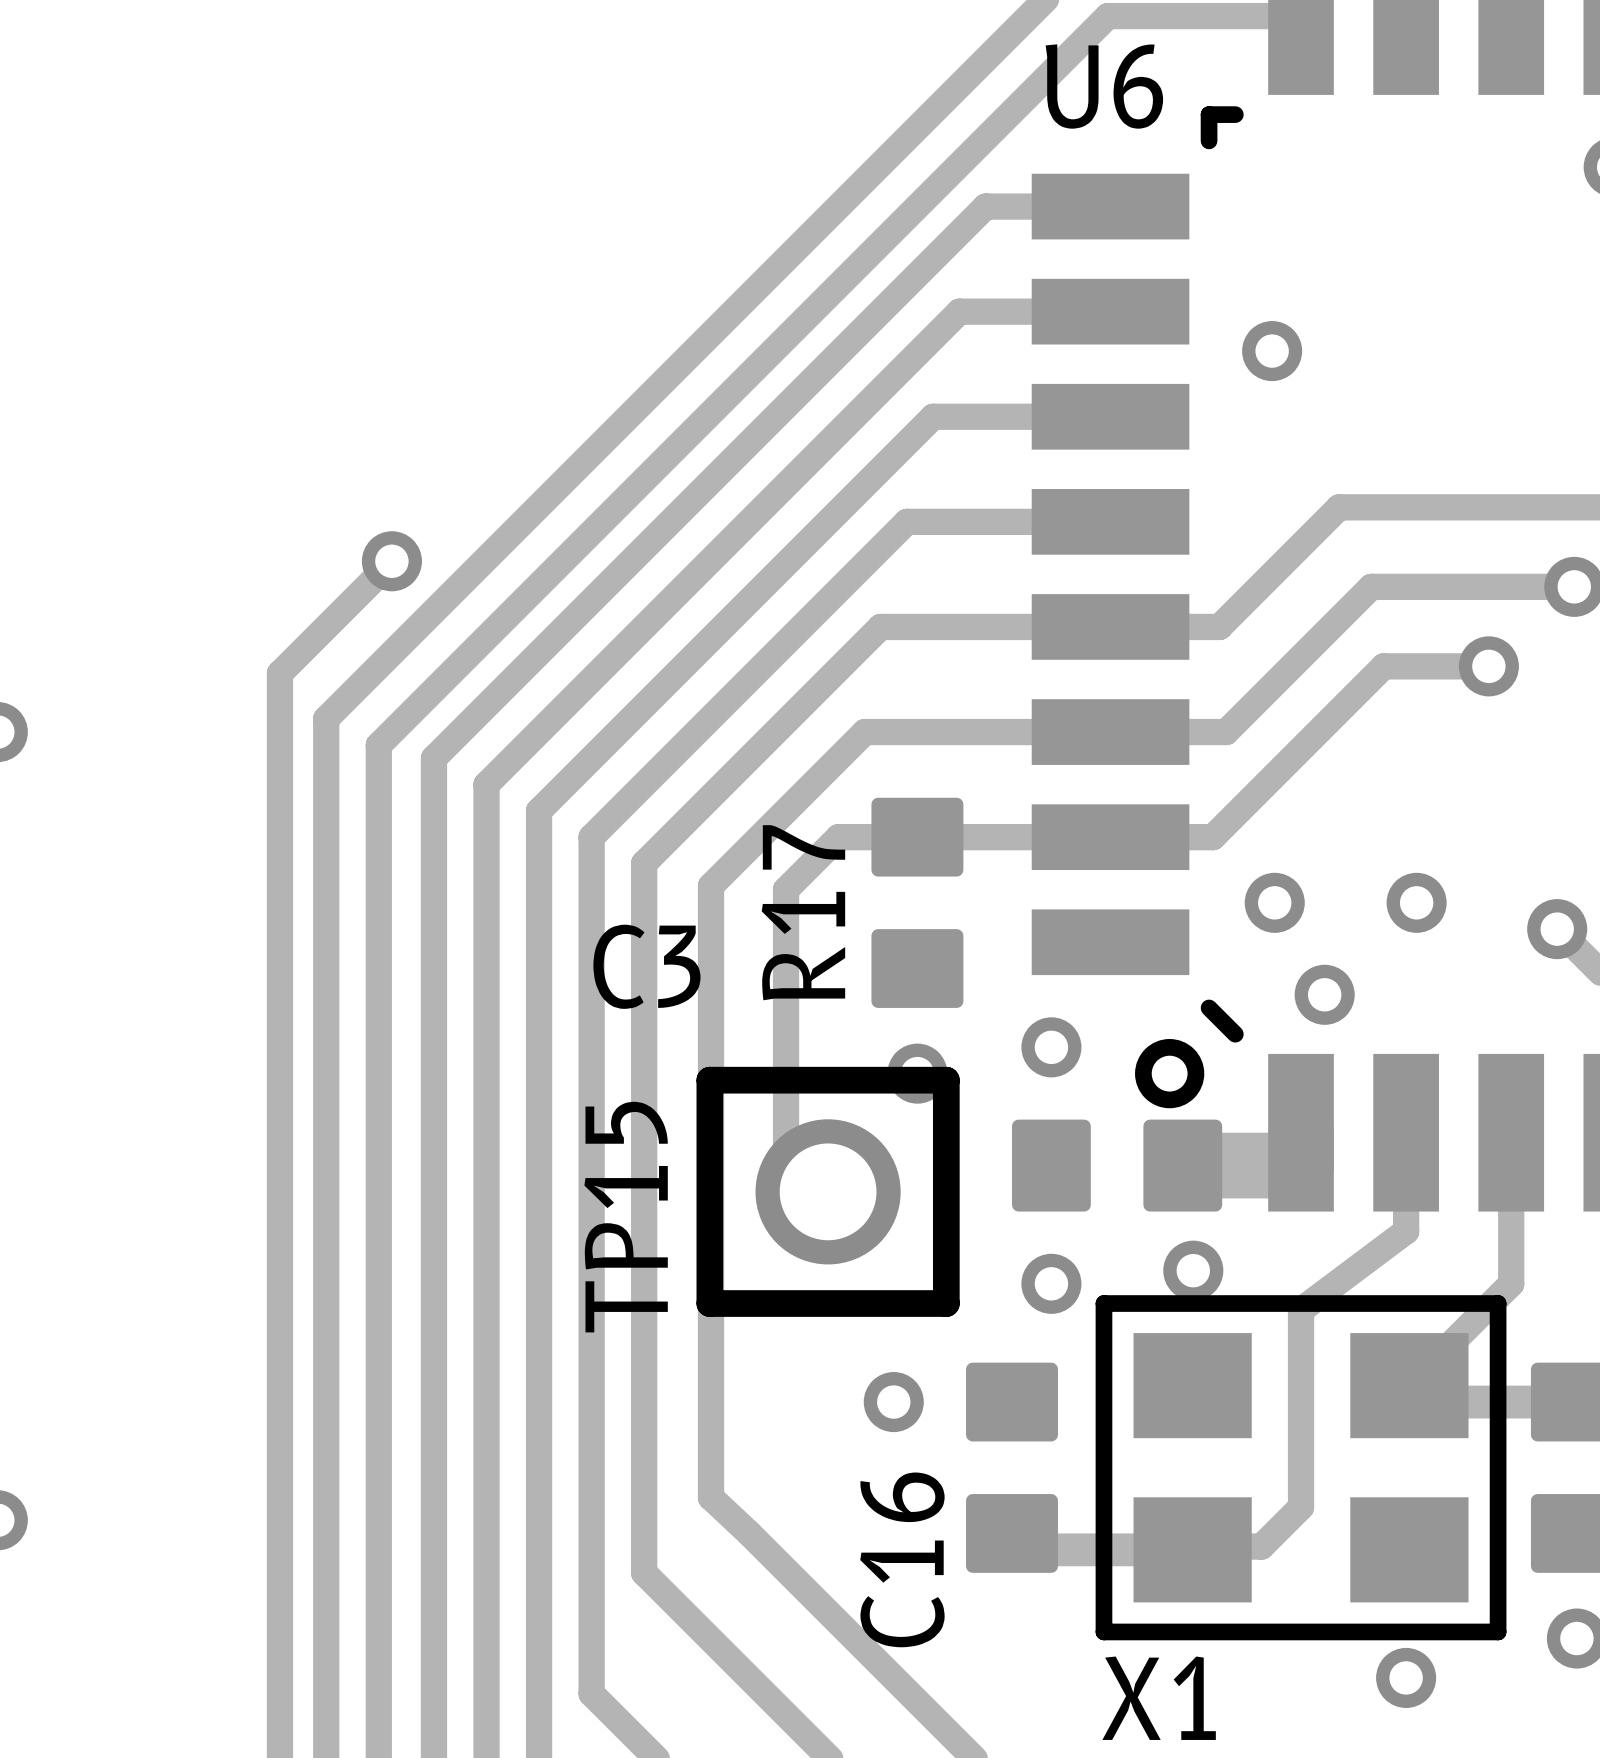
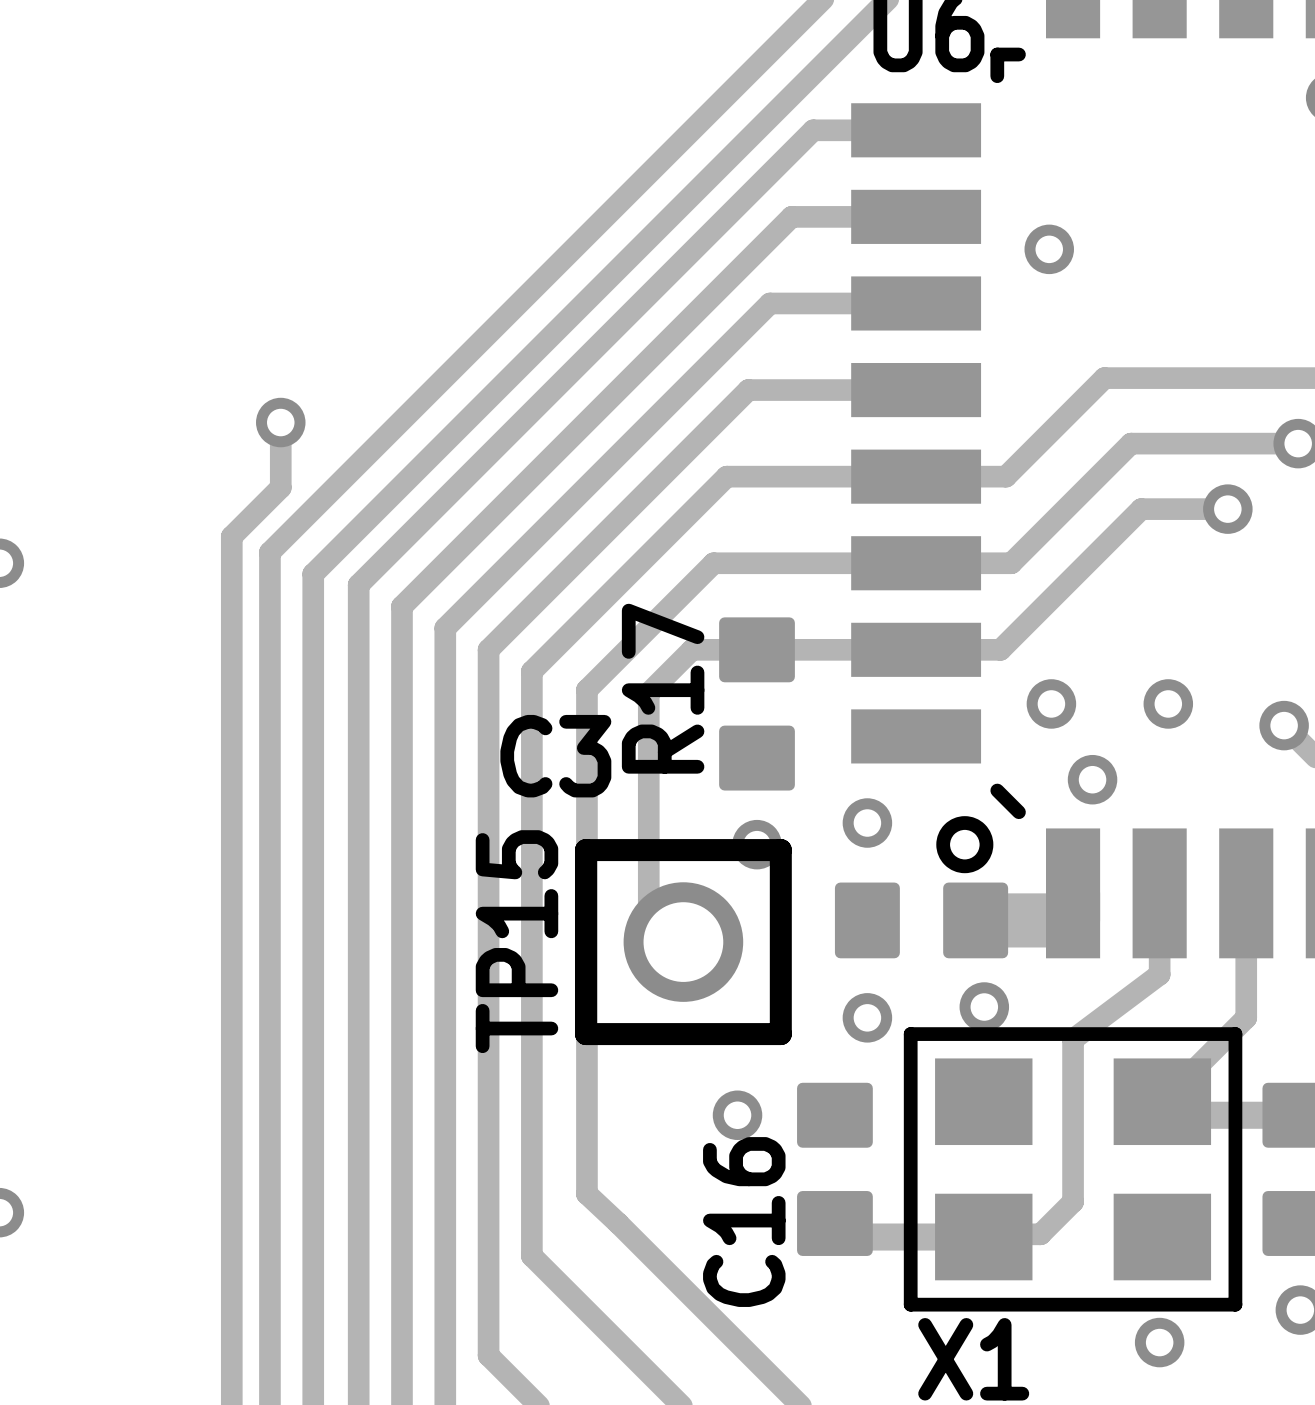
track: (391, 561) (279, 673) (279, 699) -> (280, 422) (280, 487) (231, 536)
via position: (391, 561) -> (280, 422)

